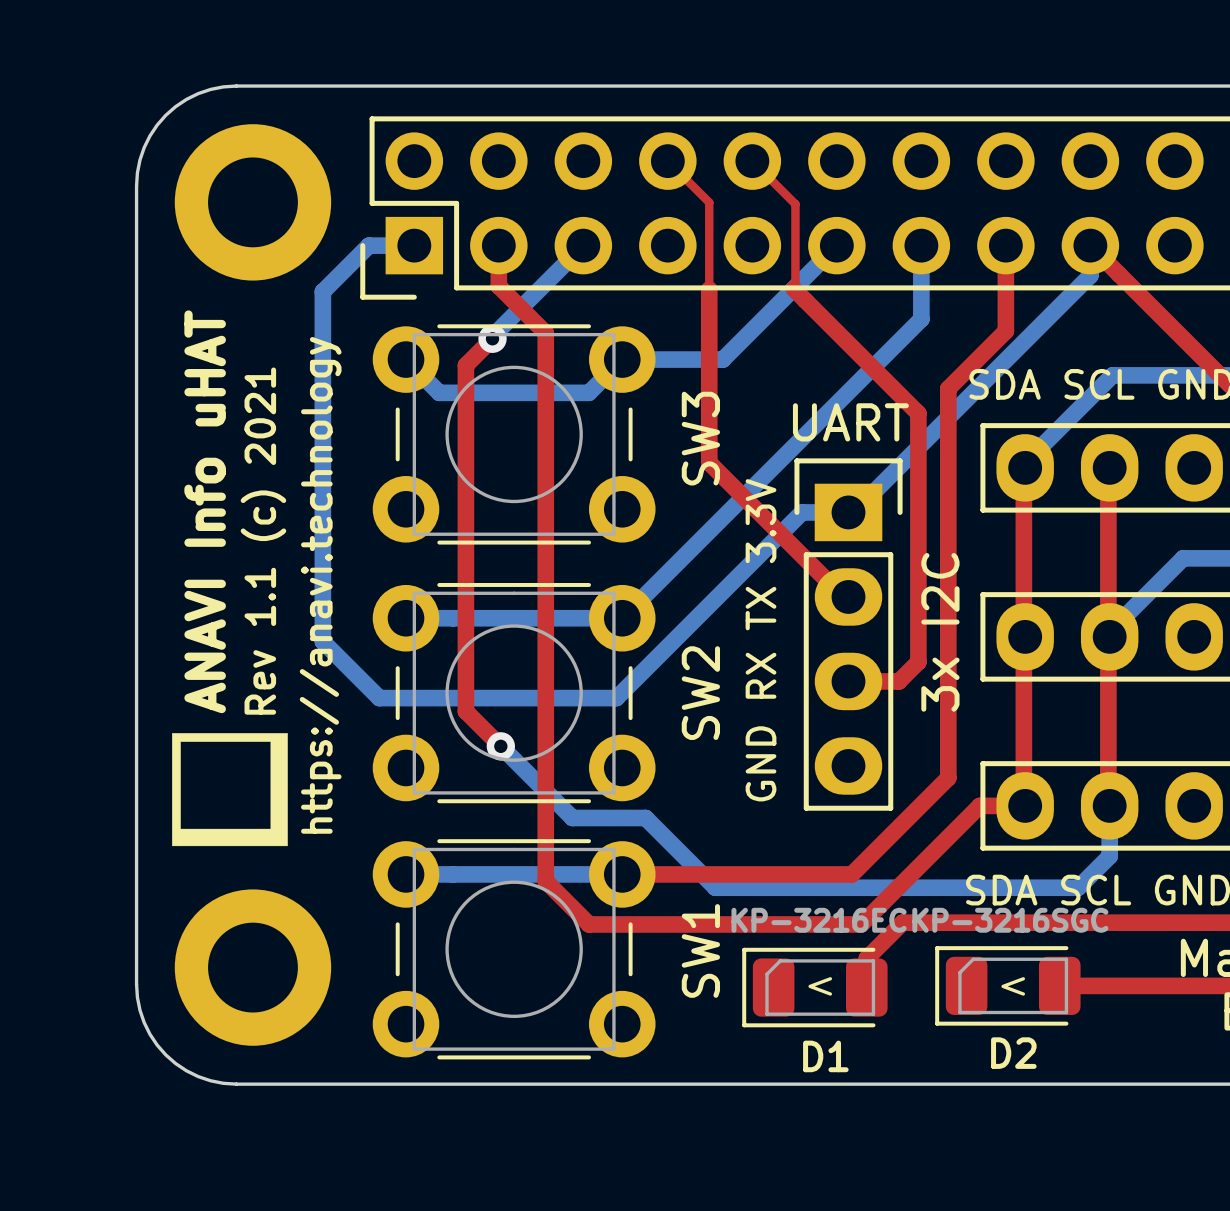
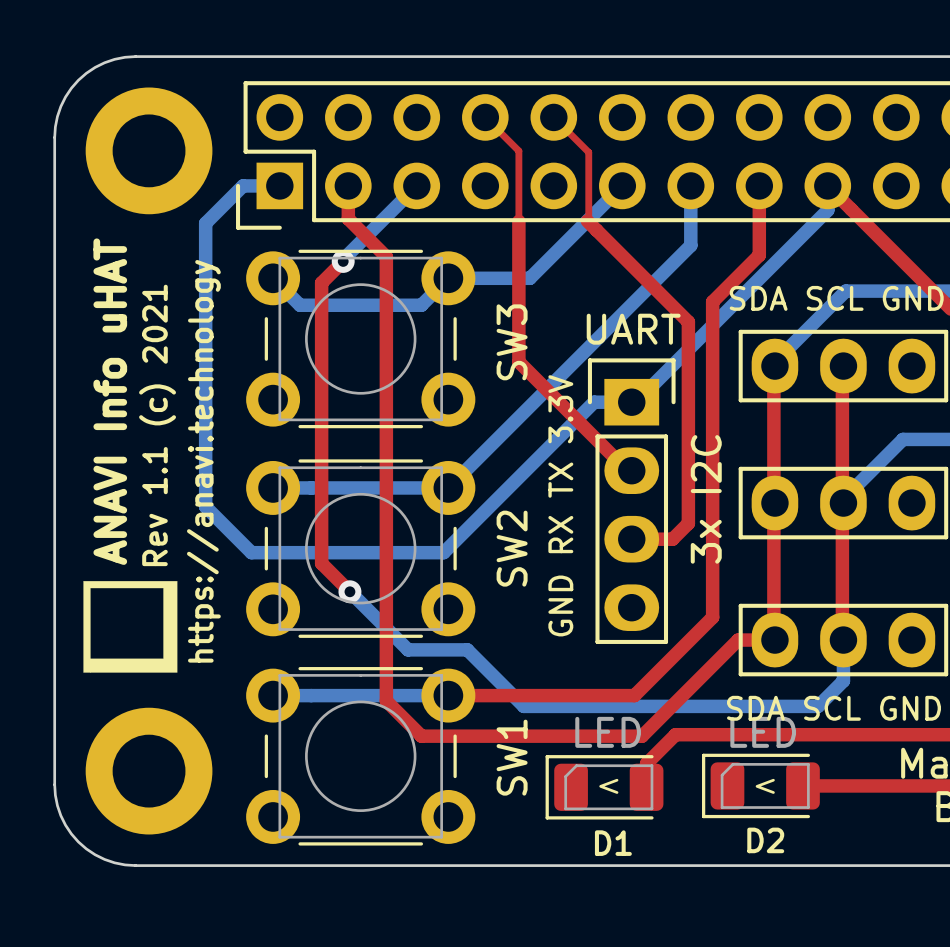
D1 value: KP-3216EC (819, 920) -> LED (608, 732)
D2 value: KP-3216SGC (1010, 920) -> LED (763, 732)

